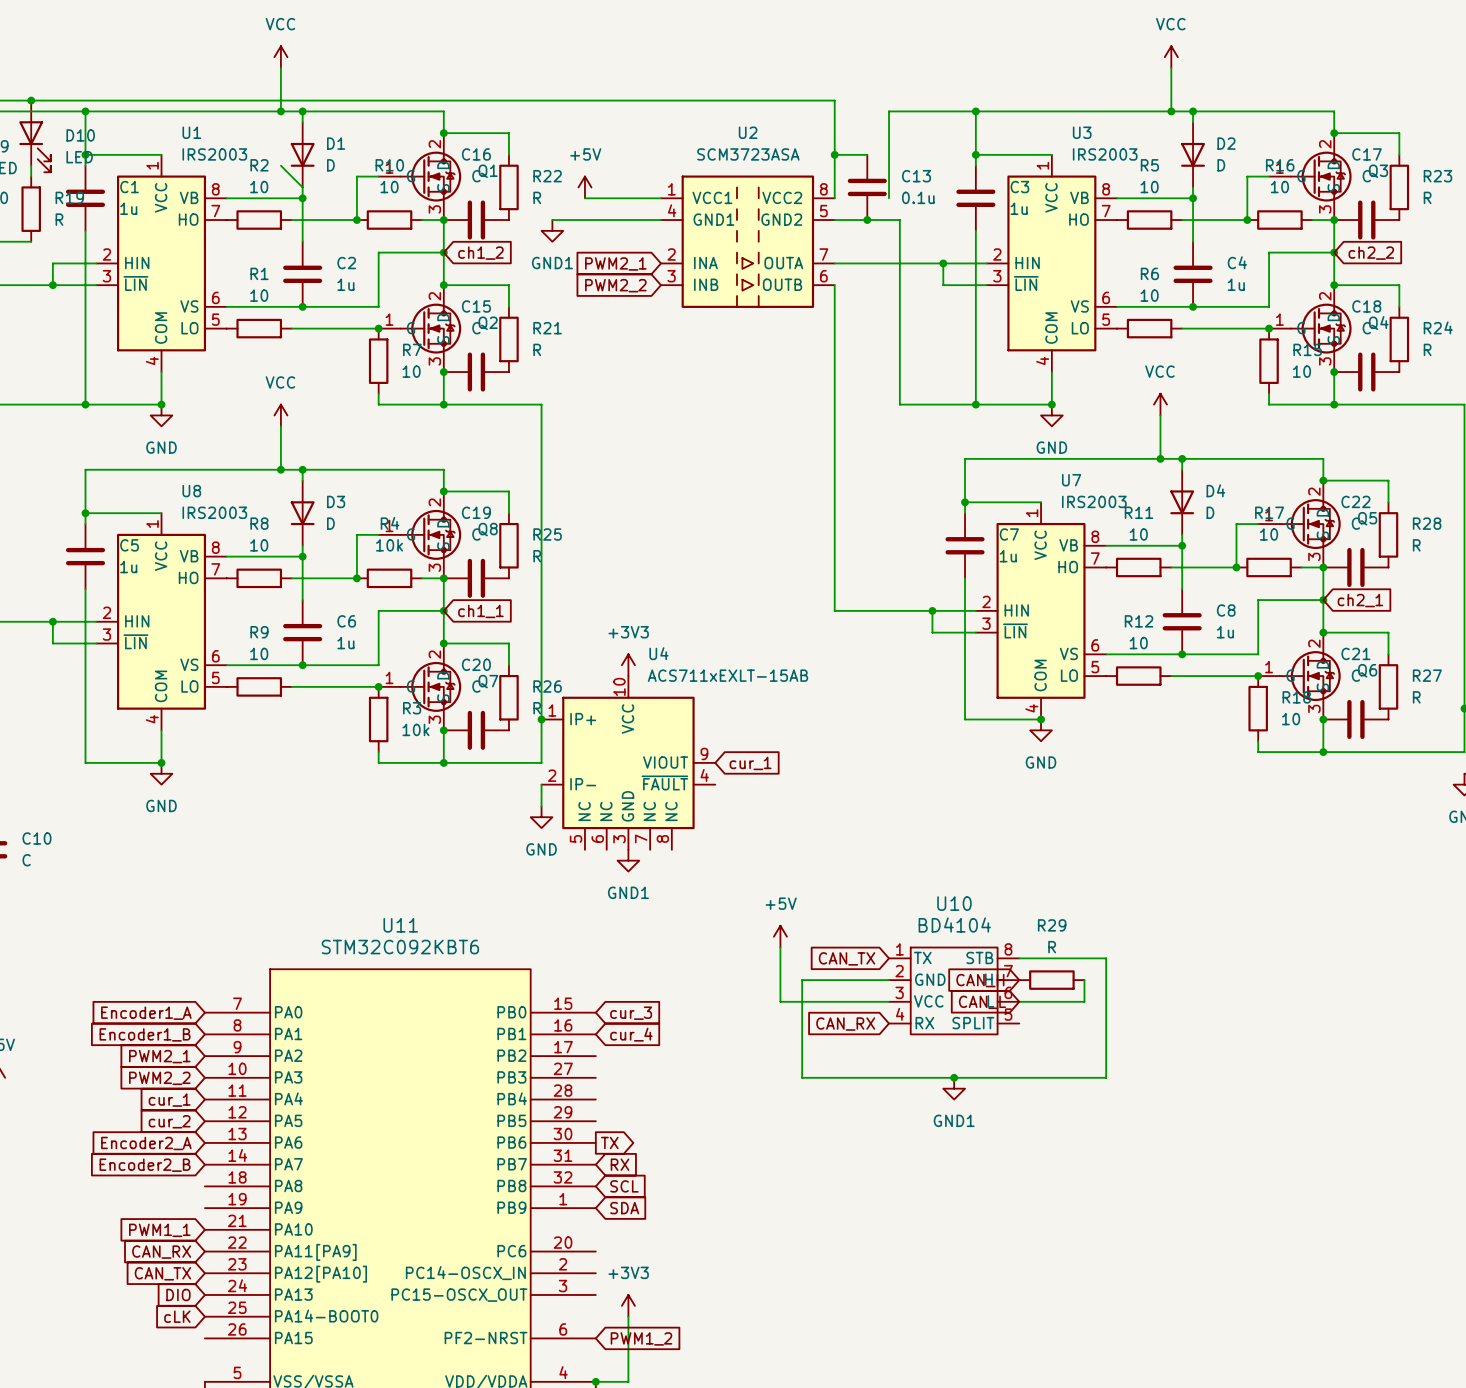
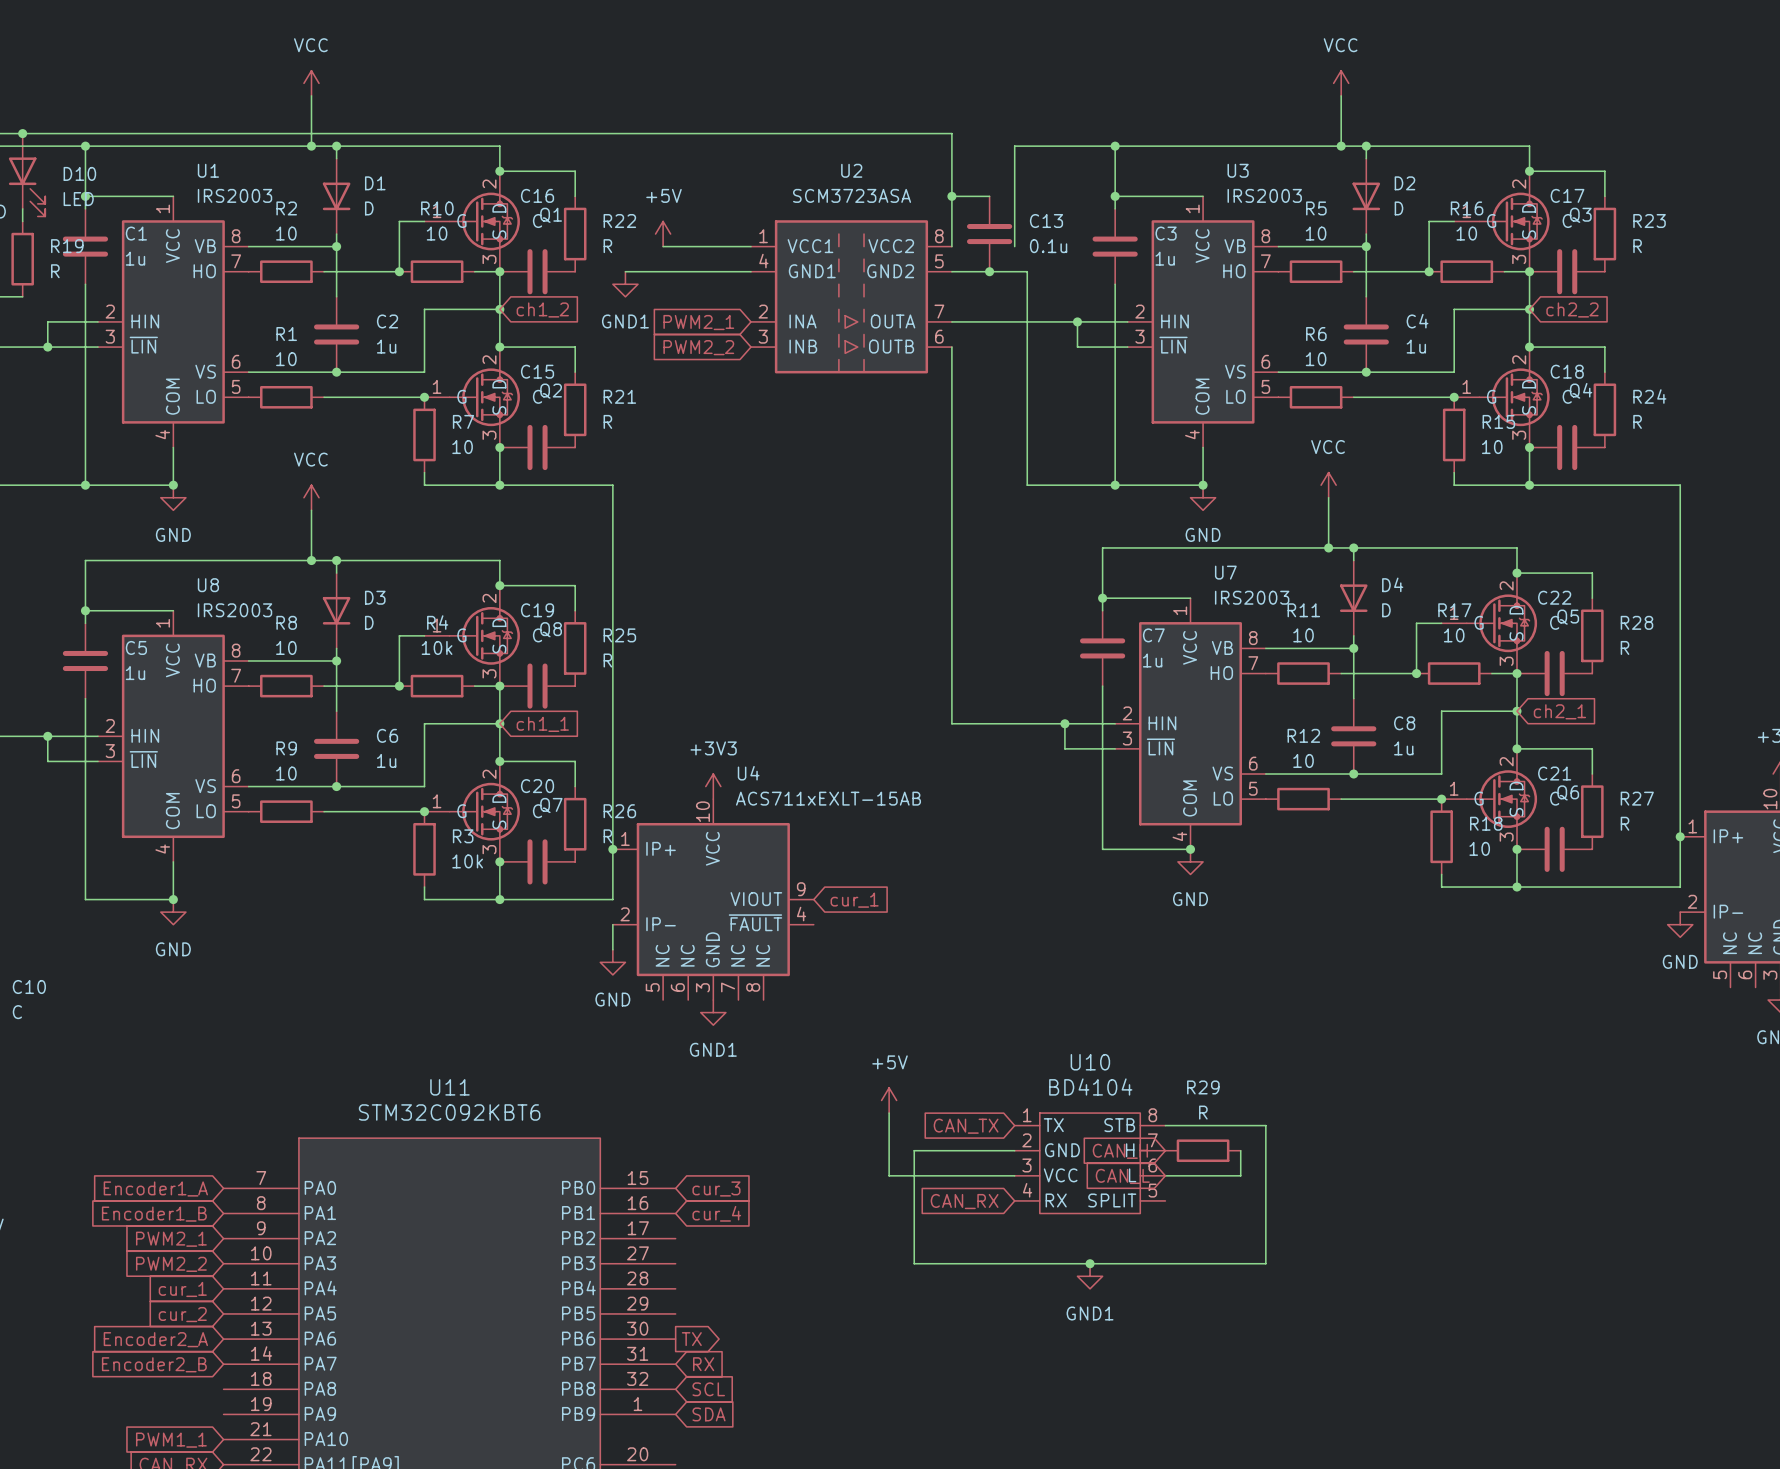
wire: (280, 165) (302, 187) -> none

